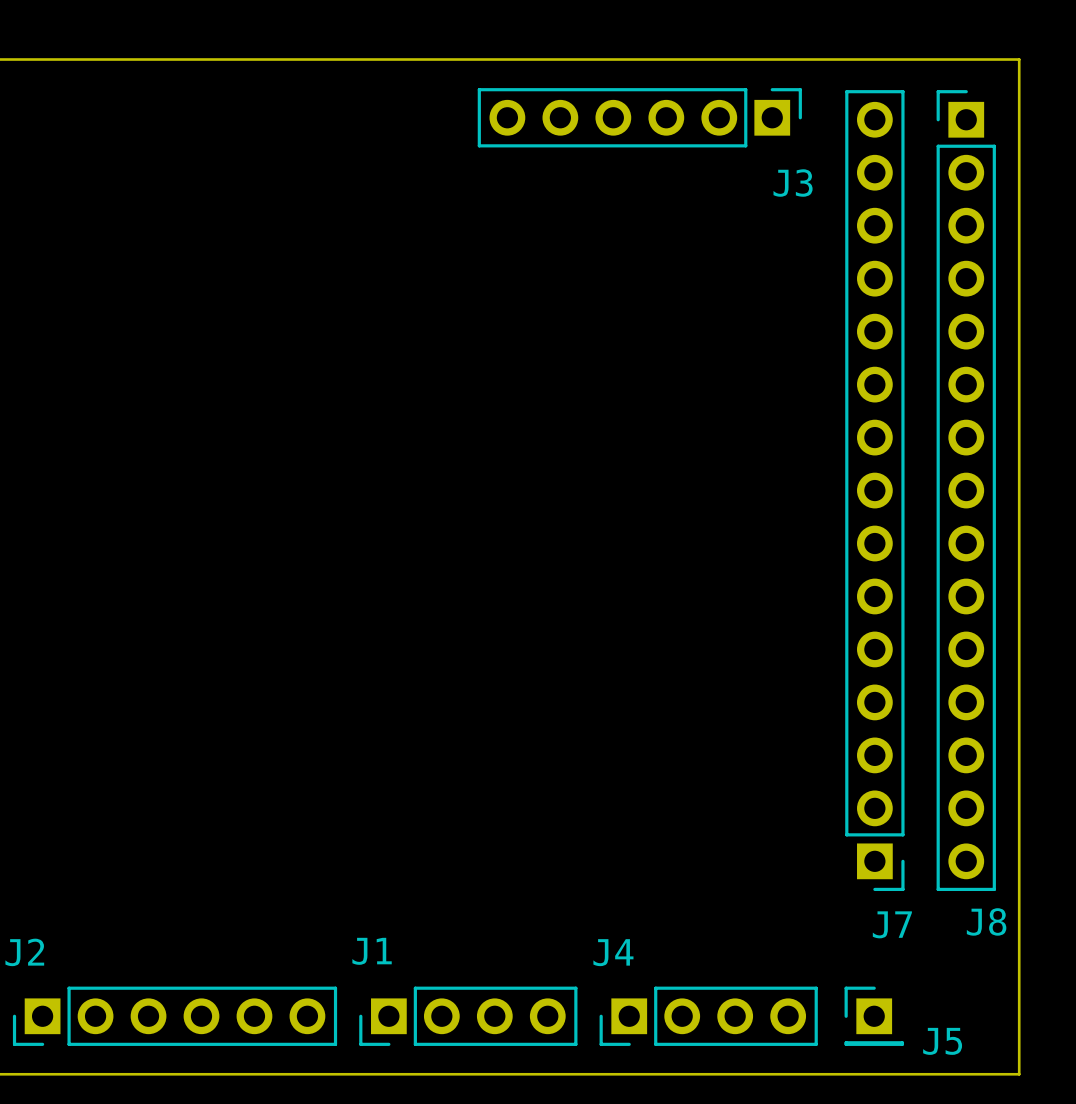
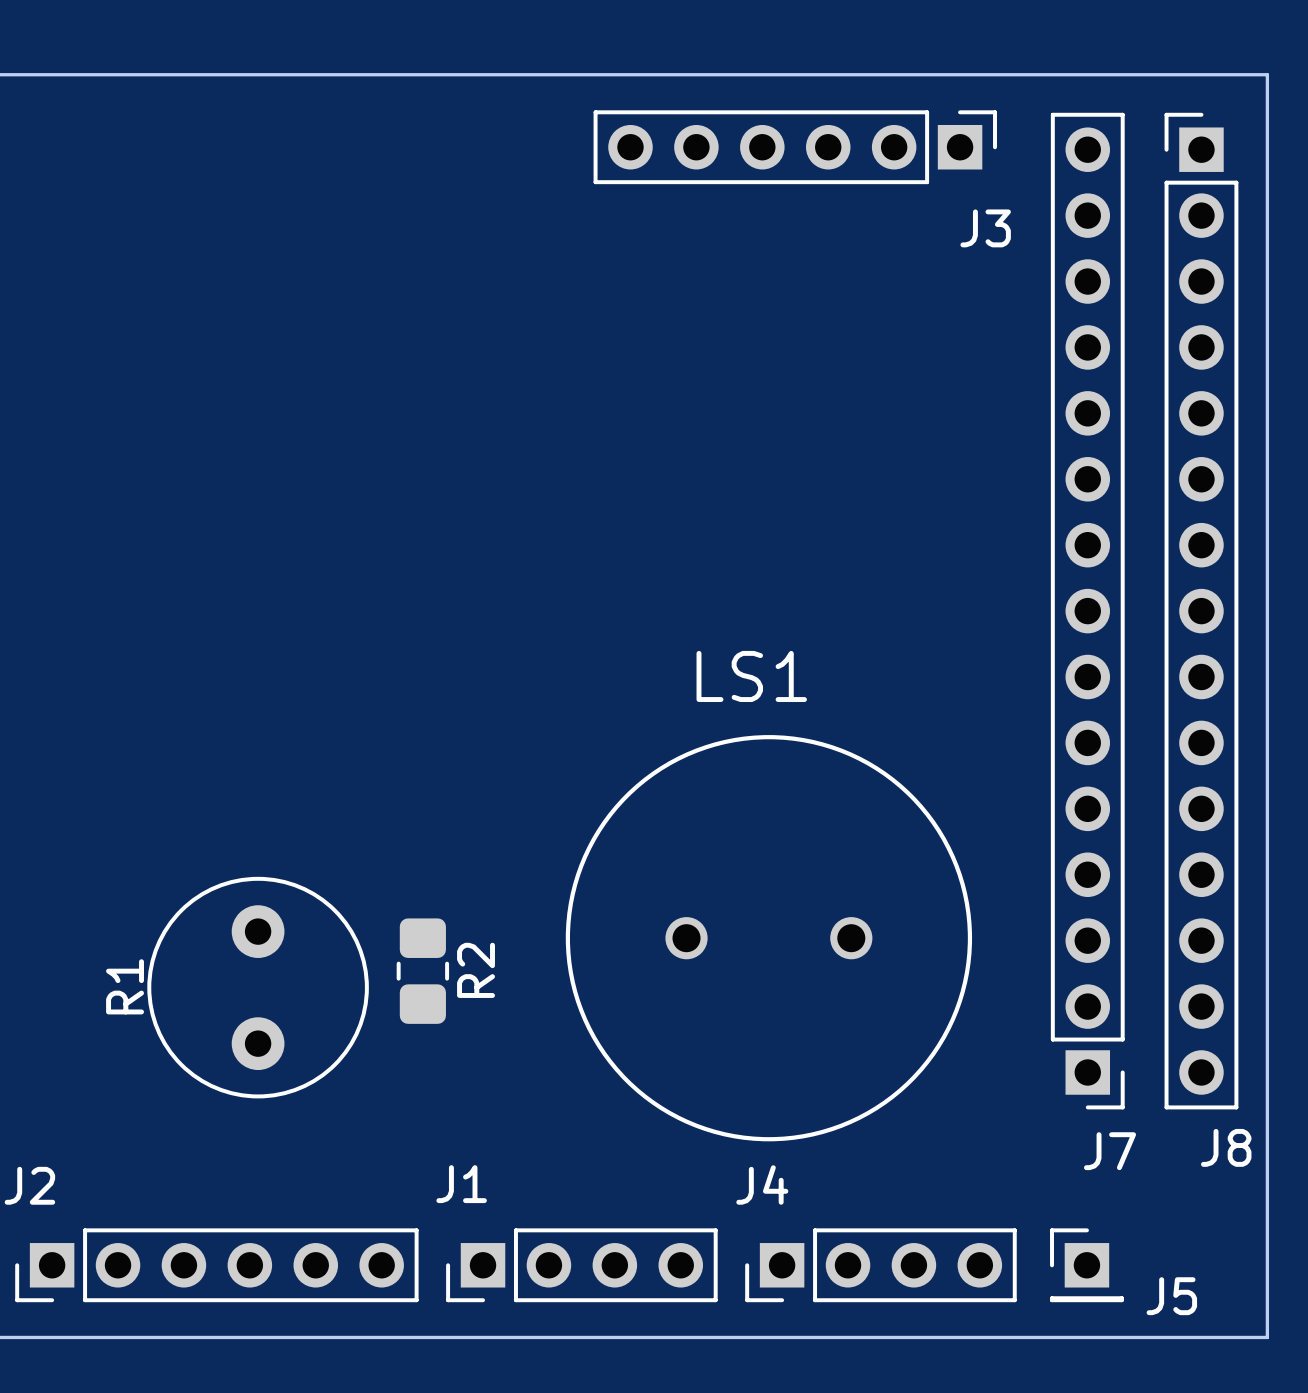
LS1: none -> (768, 938)
R2: none -> (422, 971)
R1: none -> (258, 987)

